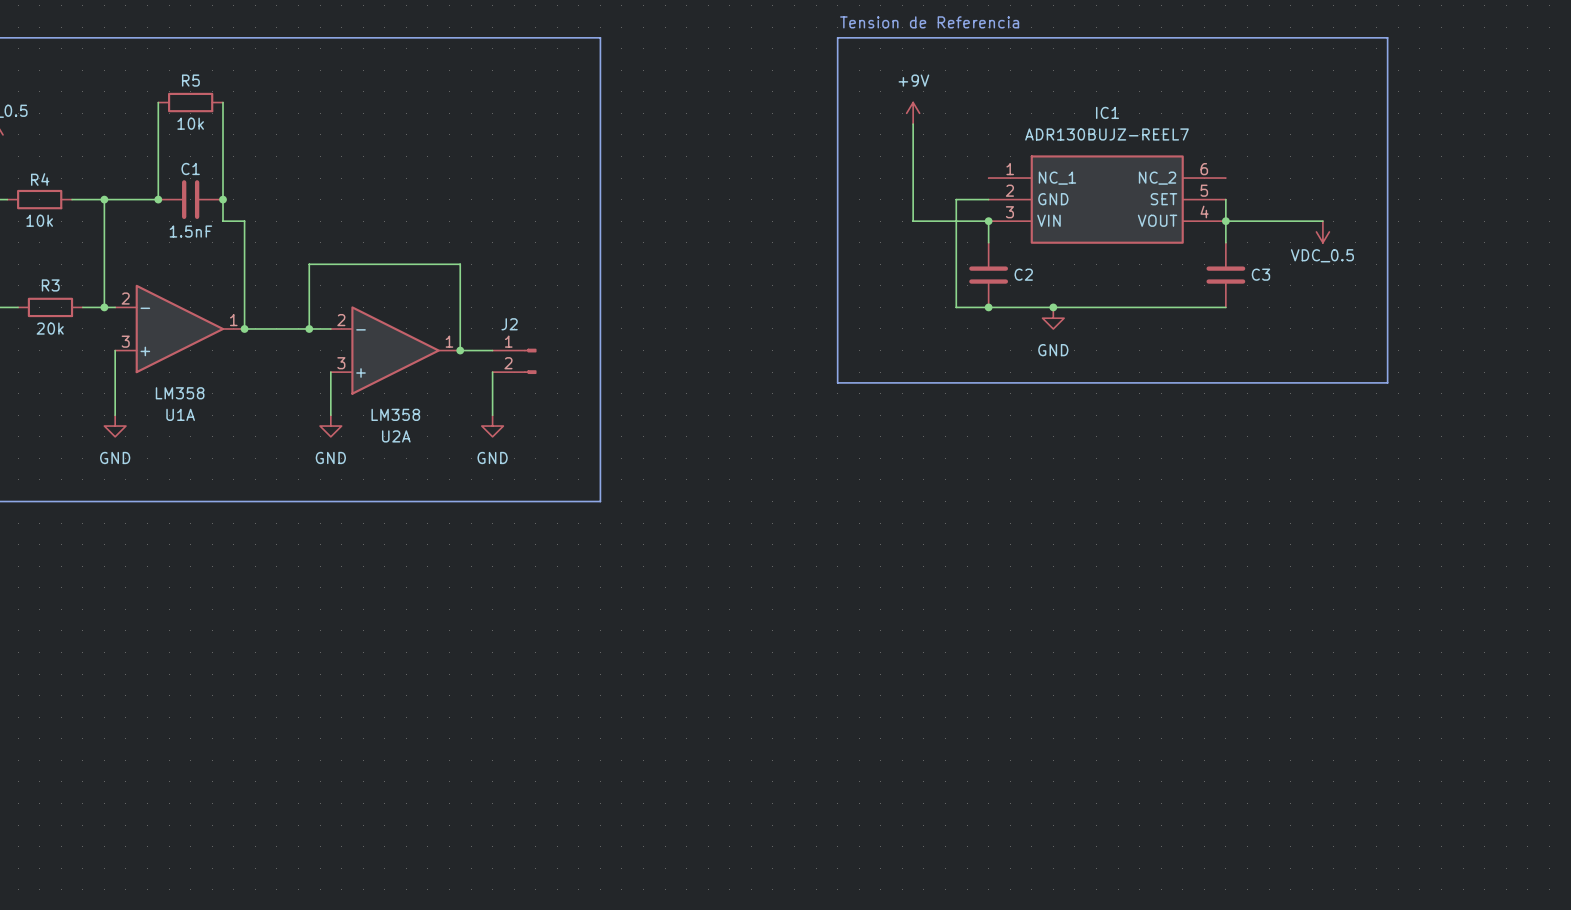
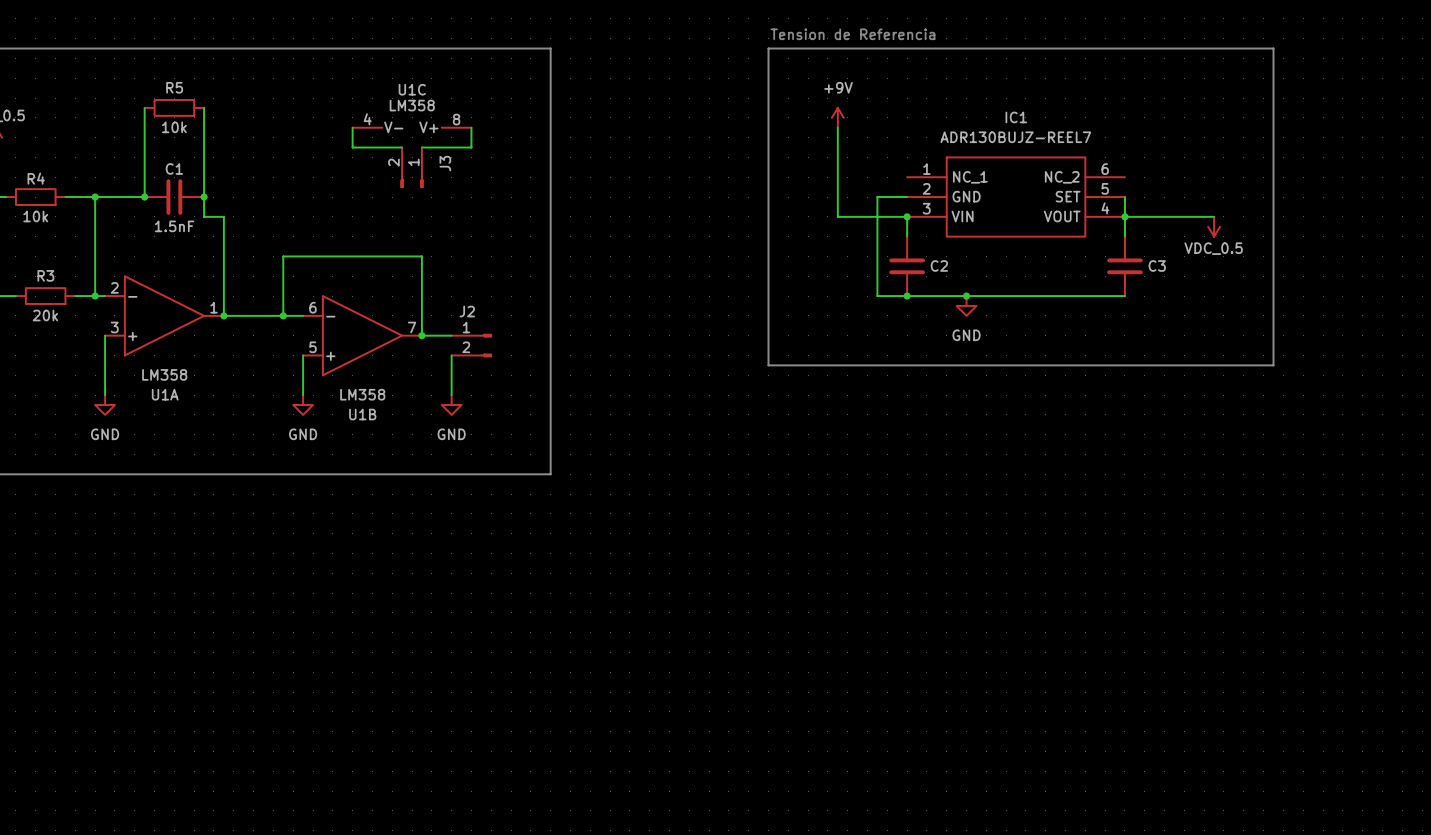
wire: none -> (352, 127) (352, 147) (402, 147)
U1C: none -> LM358 (412, 127)
wire: none -> (471, 127) (471, 147) (421, 147)
J3: none -> (412, 167)
U2A pin number: 2 (341, 320) -> 6 (313, 307)
U2A pin number: 1 (449, 341) -> 7 (412, 327)
U2A pin number: 3 (341, 363) -> 5 (313, 347)
U2A name: U2A (396, 436) -> U1B (362, 414)

